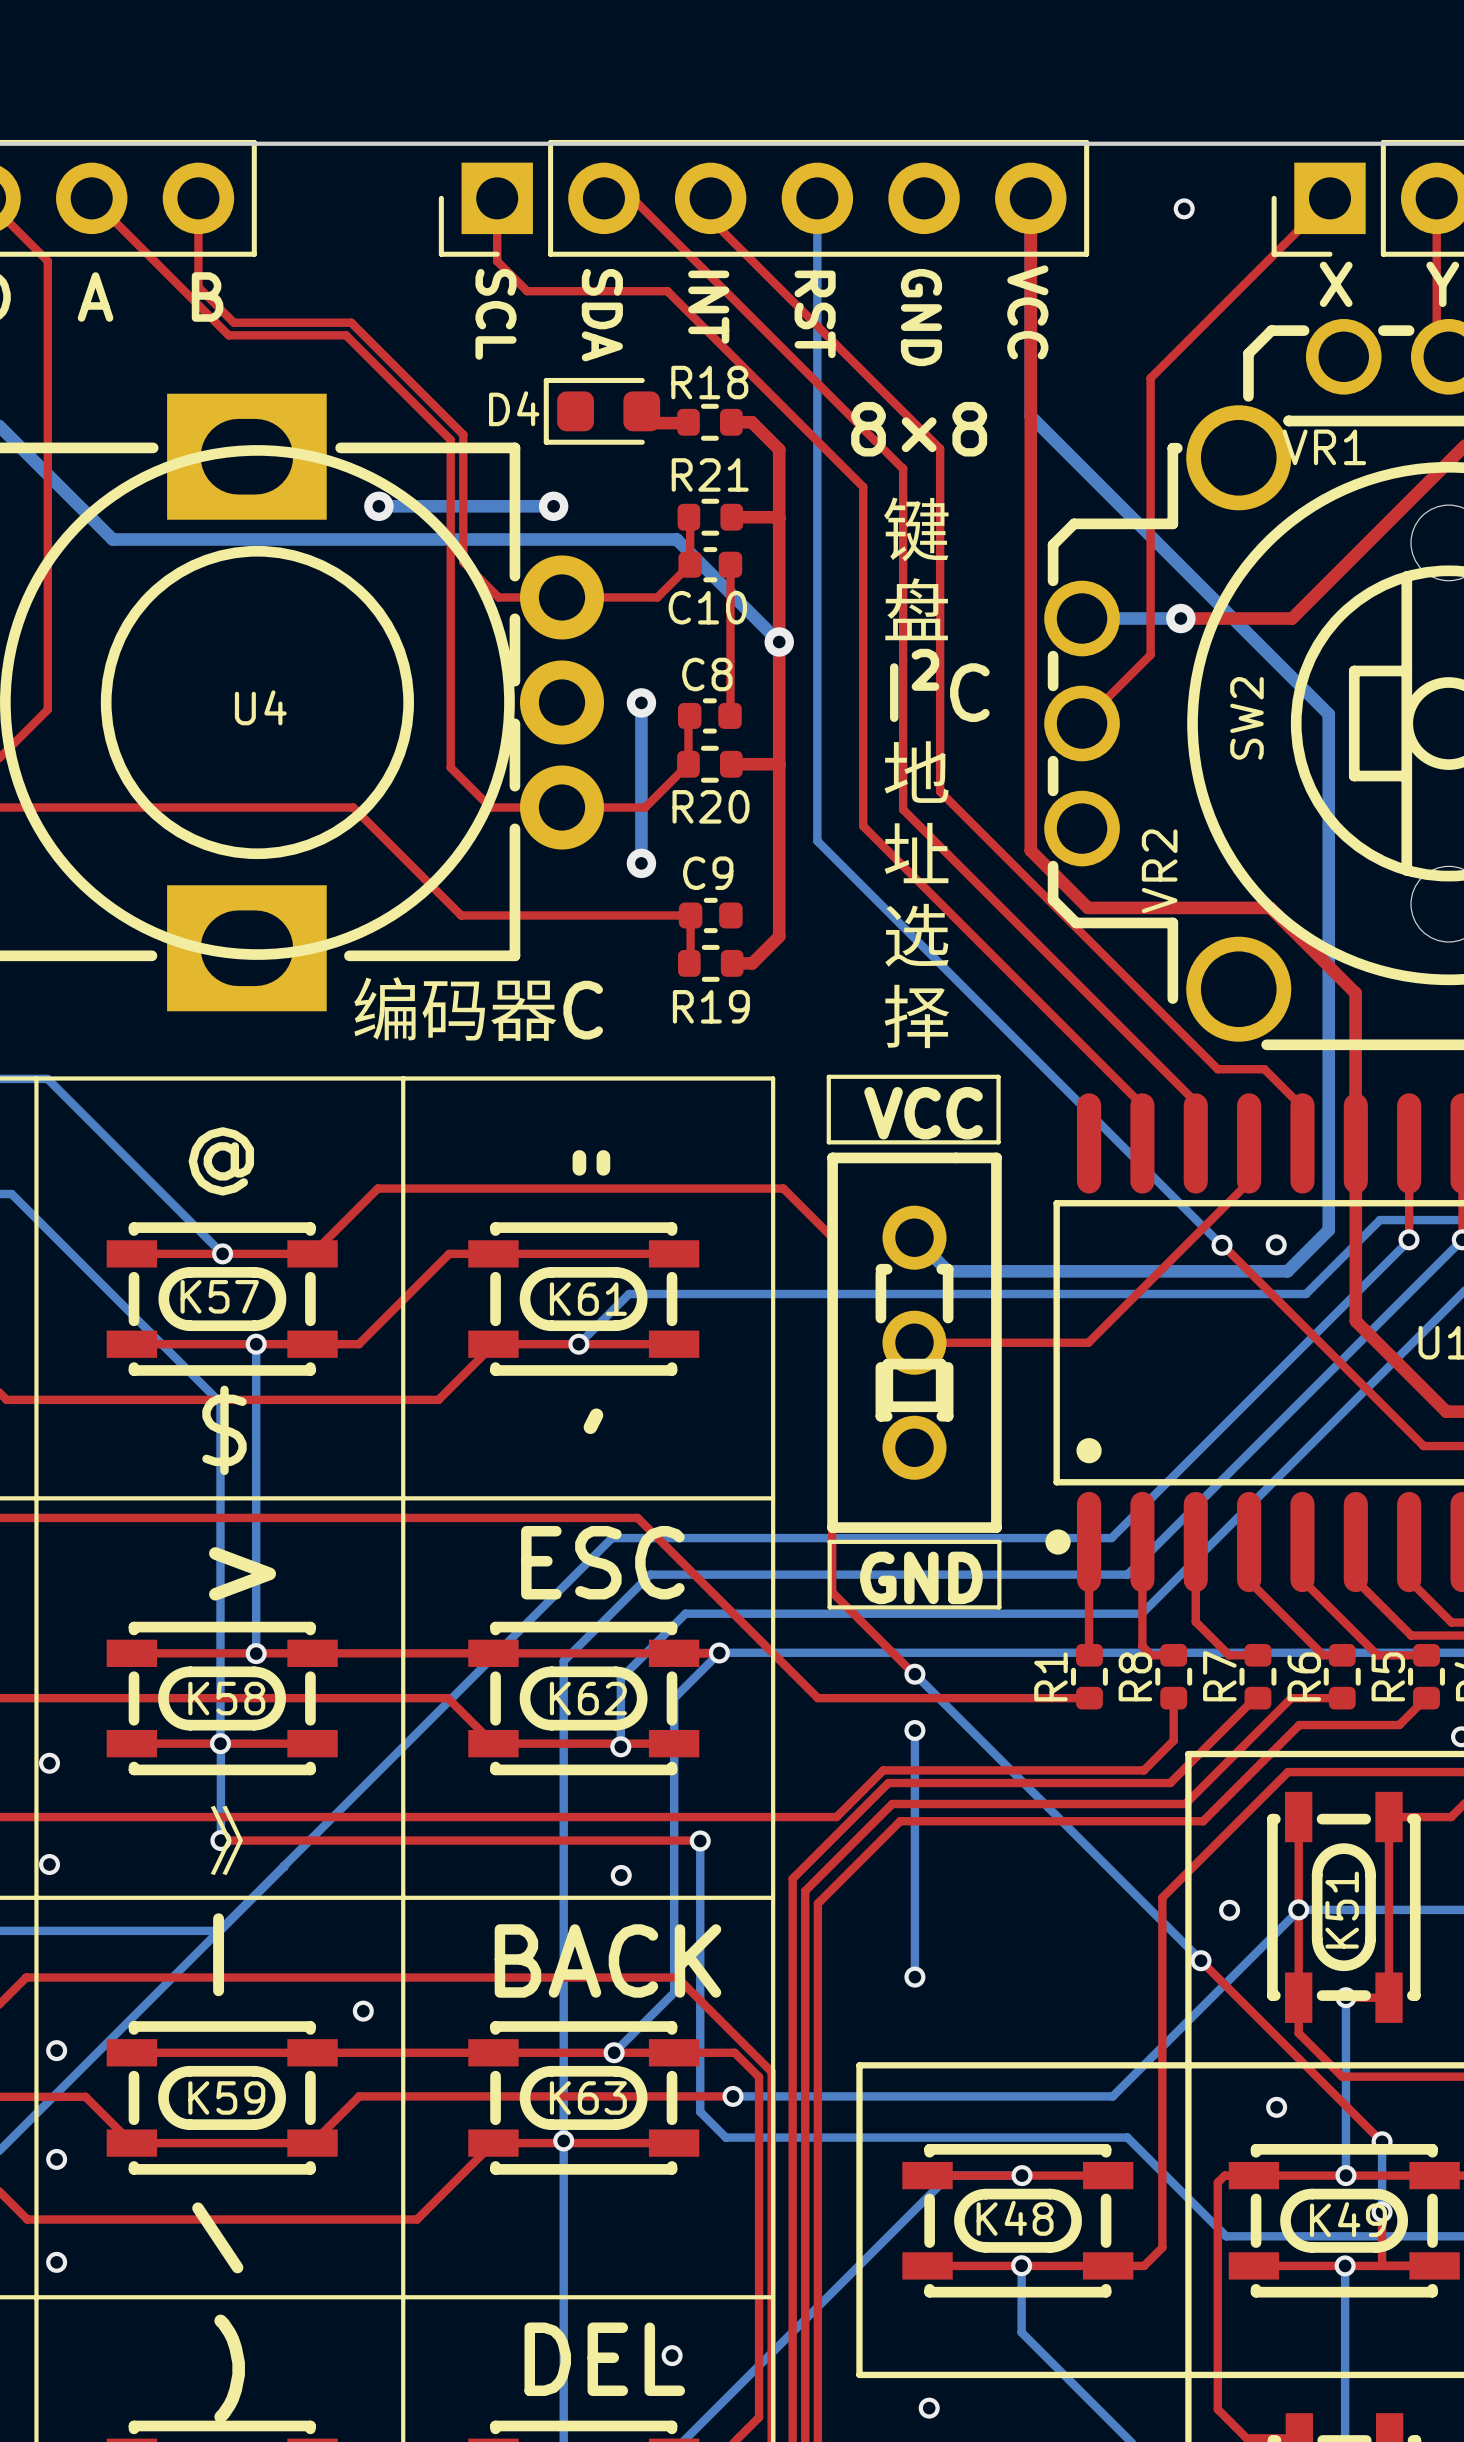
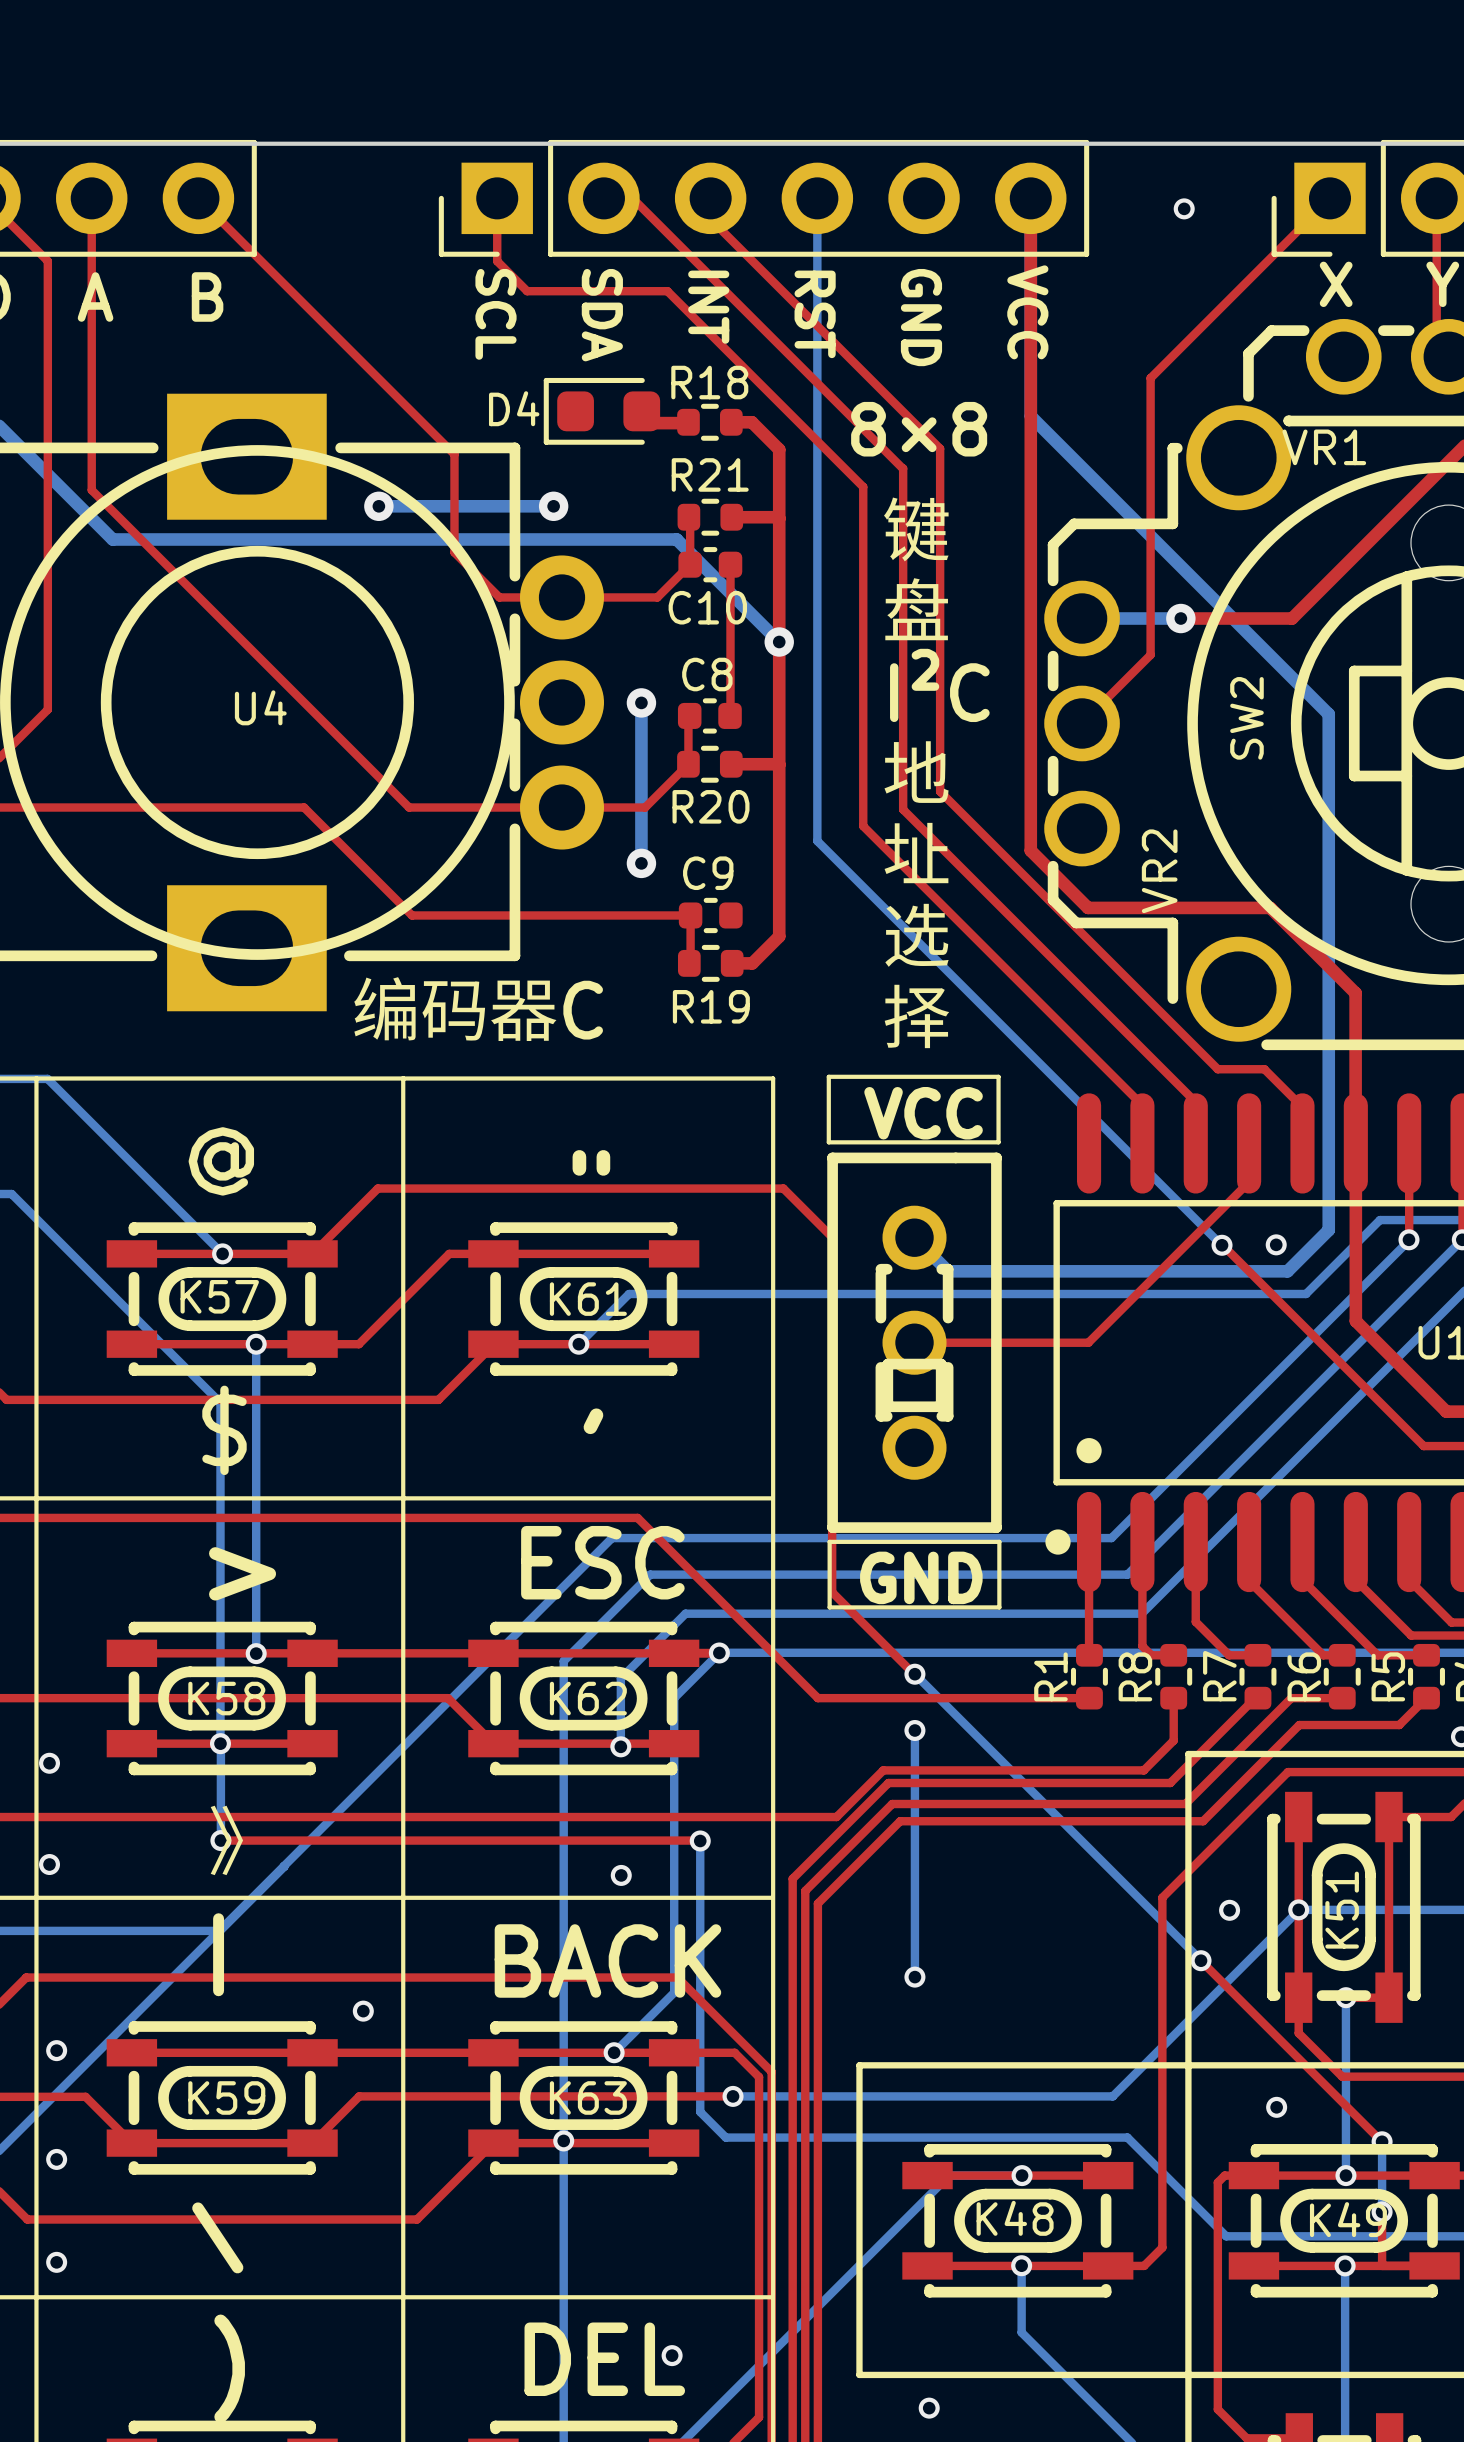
top track: (91, 198) (228, 335) (346, 335) (450, 439) (450, 767) (490, 807) -> (91, 198) (91, 490) (409, 807) (490, 807)
top track: (198, 198) (198, 287) (233, 322) (351, 322) (463, 434) (463, 562) (498, 597) -> (198, 198) (454, 454) (454, 552) (499, 597)
top track: (304, 807) (353, 807) (461, 915) -> (304, 807) (412, 915) (461, 915)

